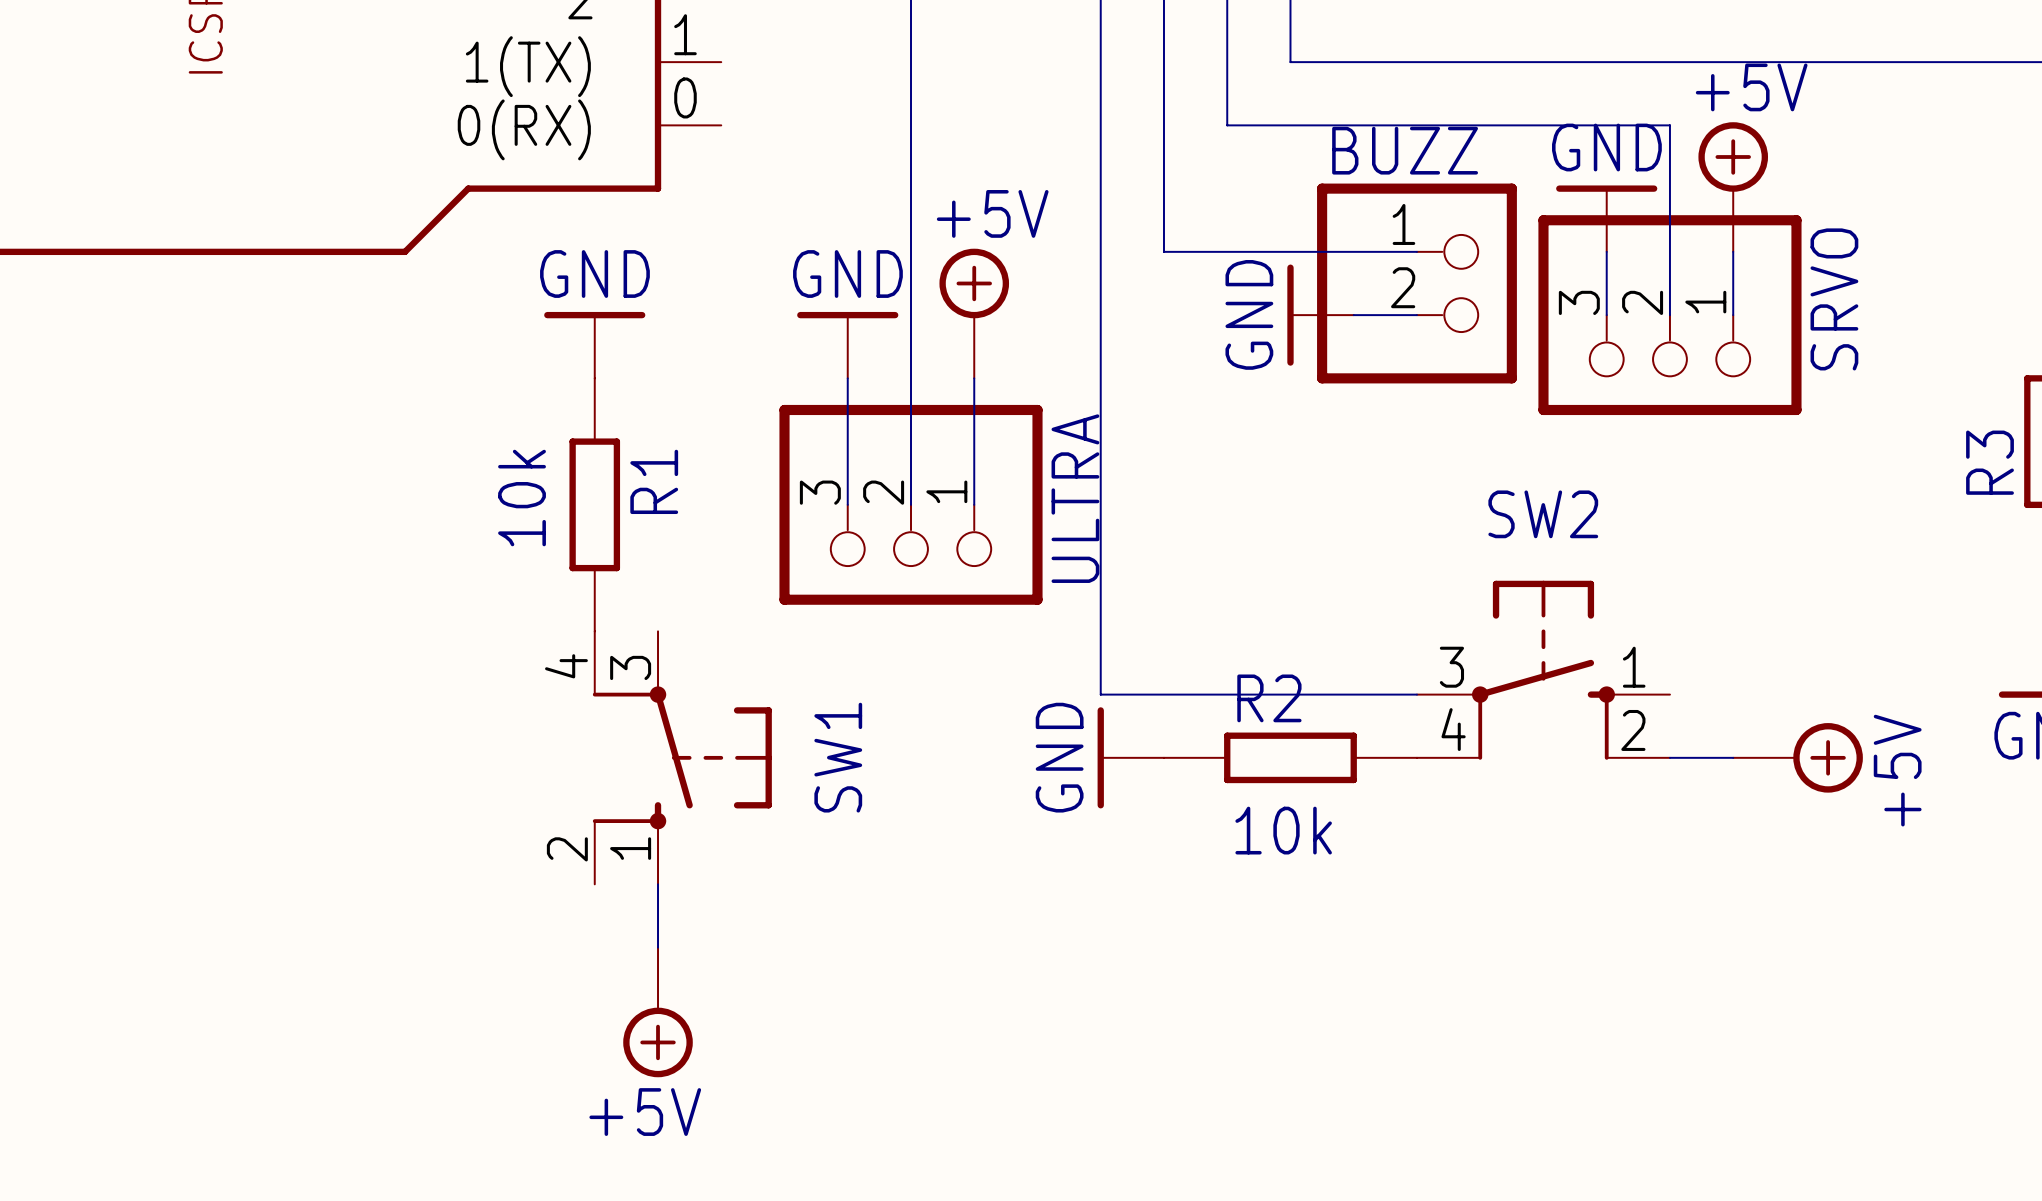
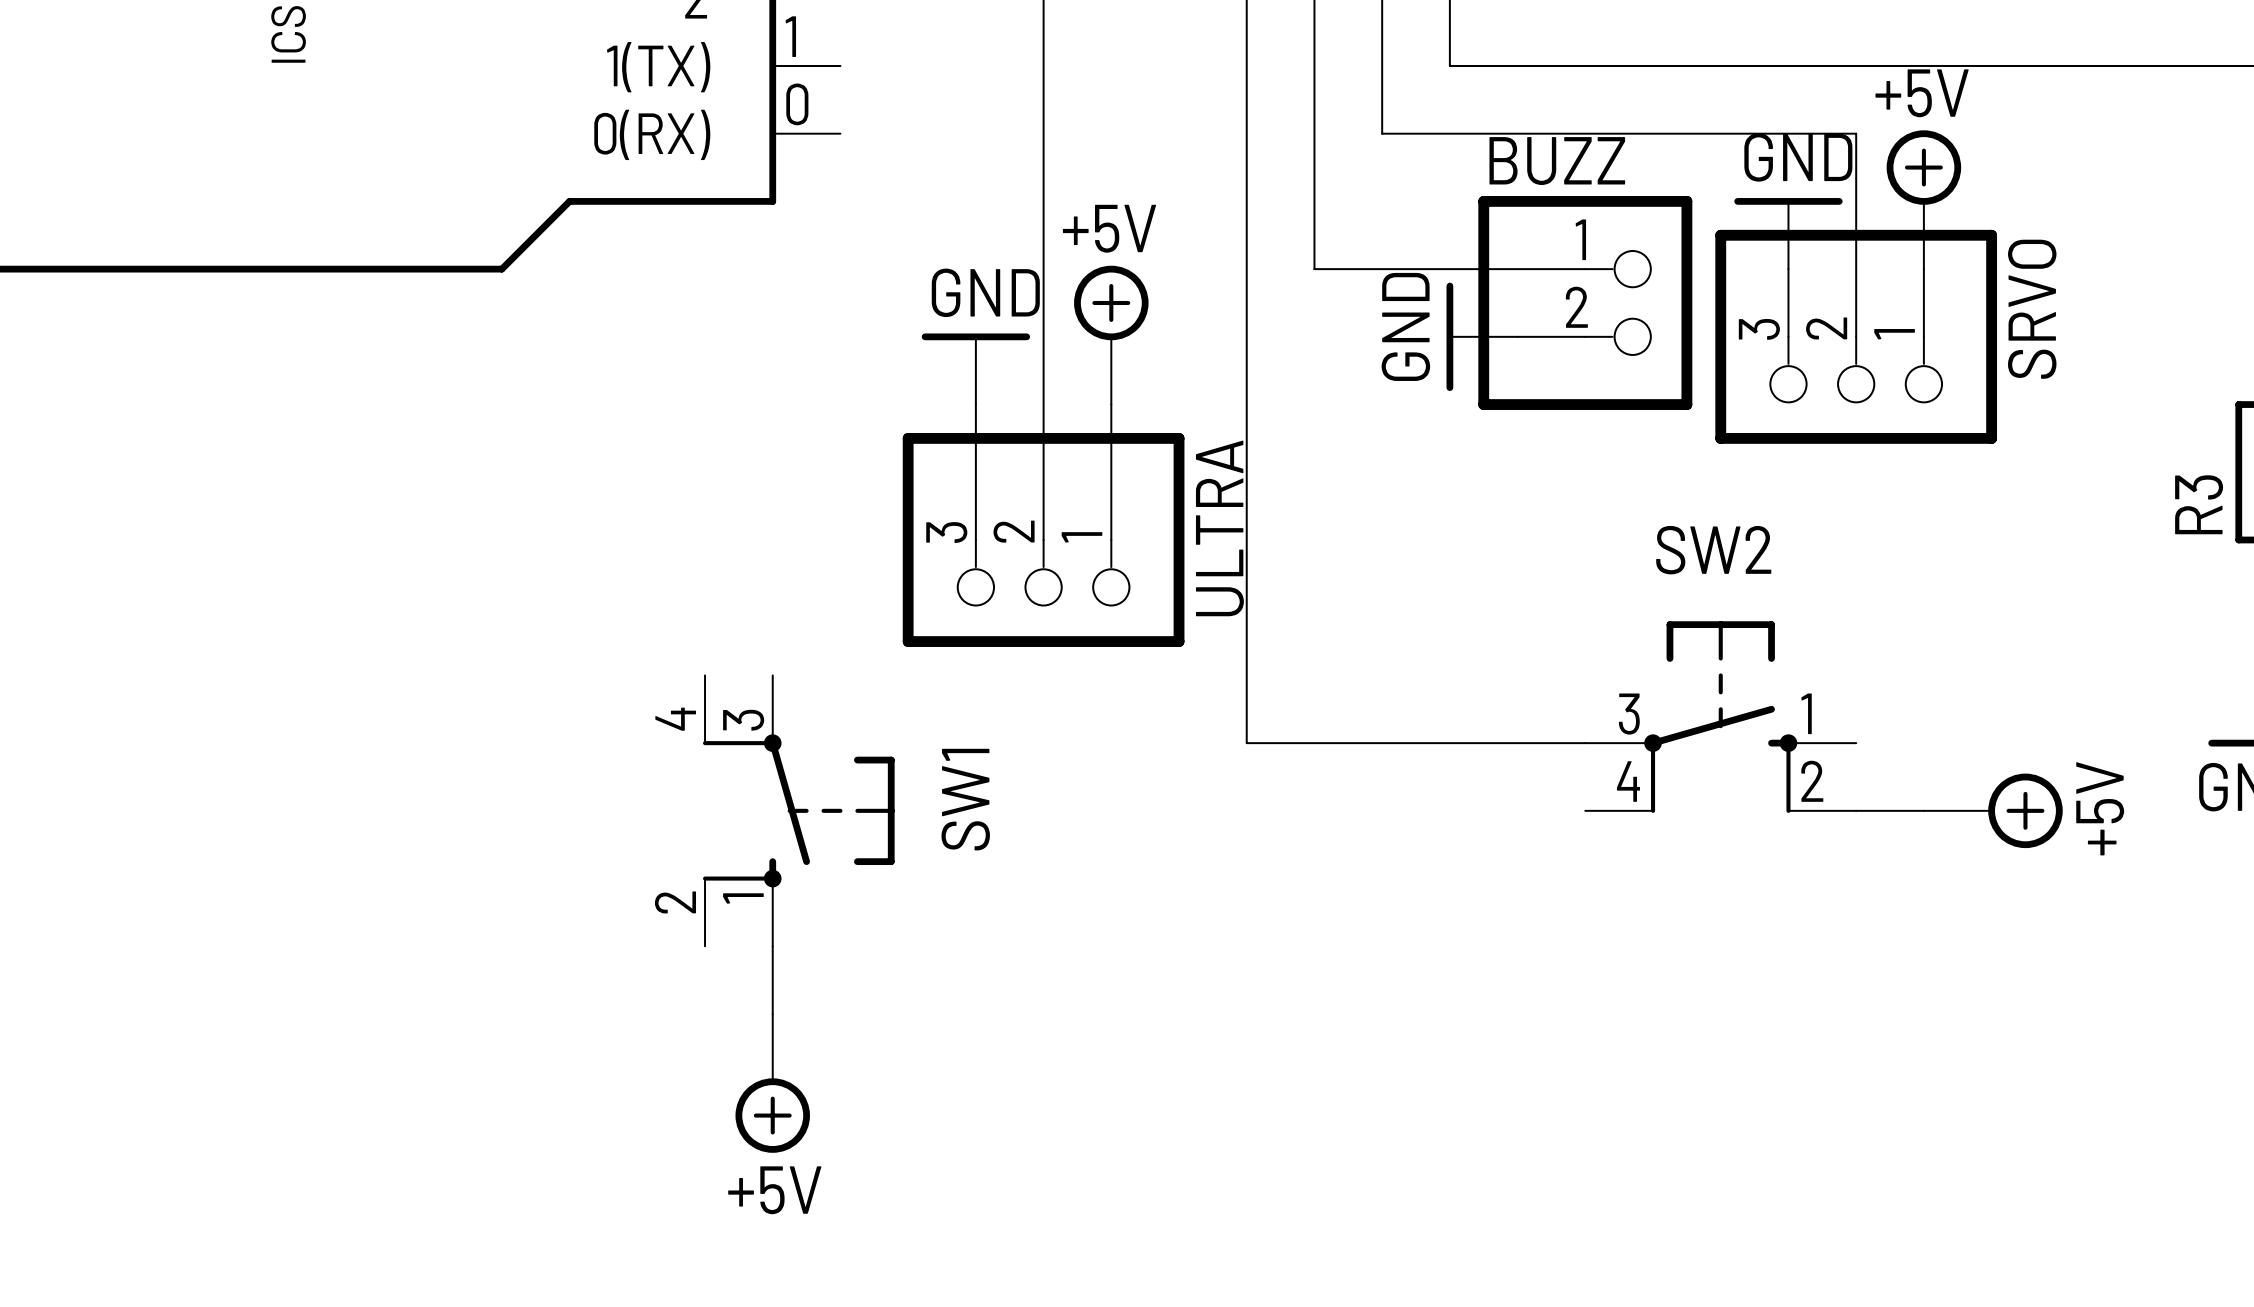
power symbol: GND (594, 345) -> none
R1: 10k (594, 504) -> none
power symbol: GND (1130, 757) -> none
R2: 10k (1290, 757) -> none

